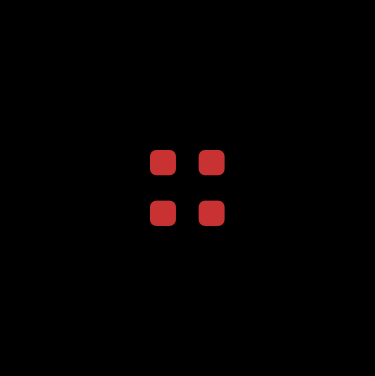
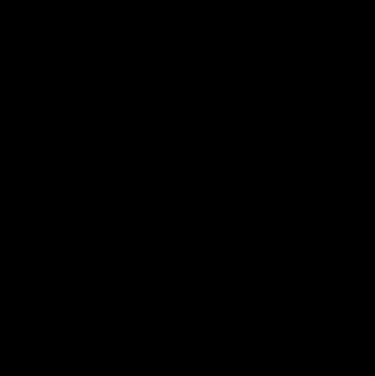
part: (187, 162) -> none
part: (187, 213) -> none

